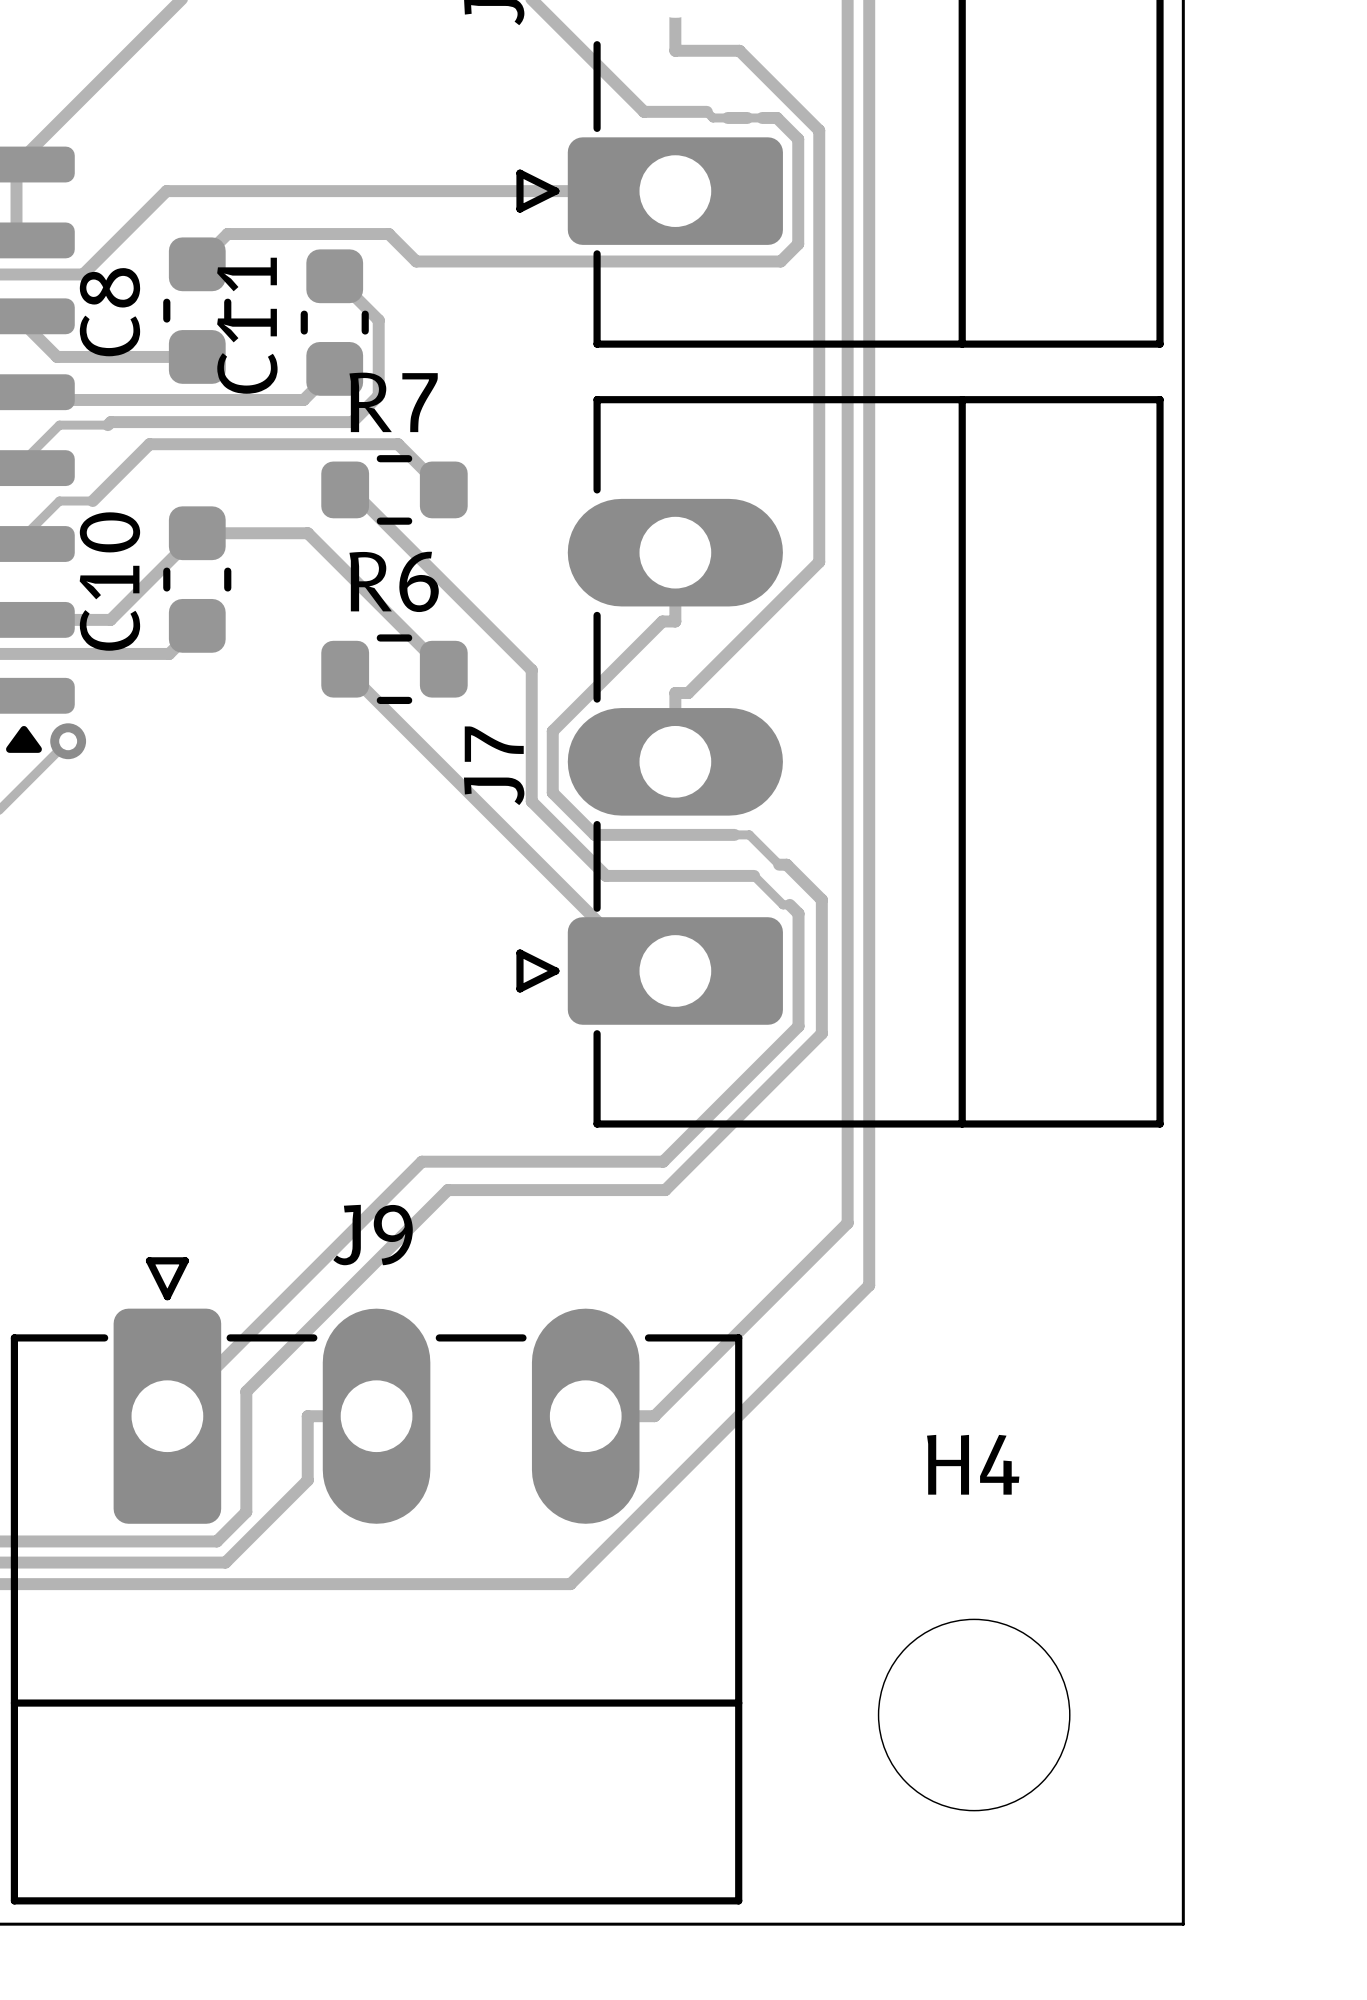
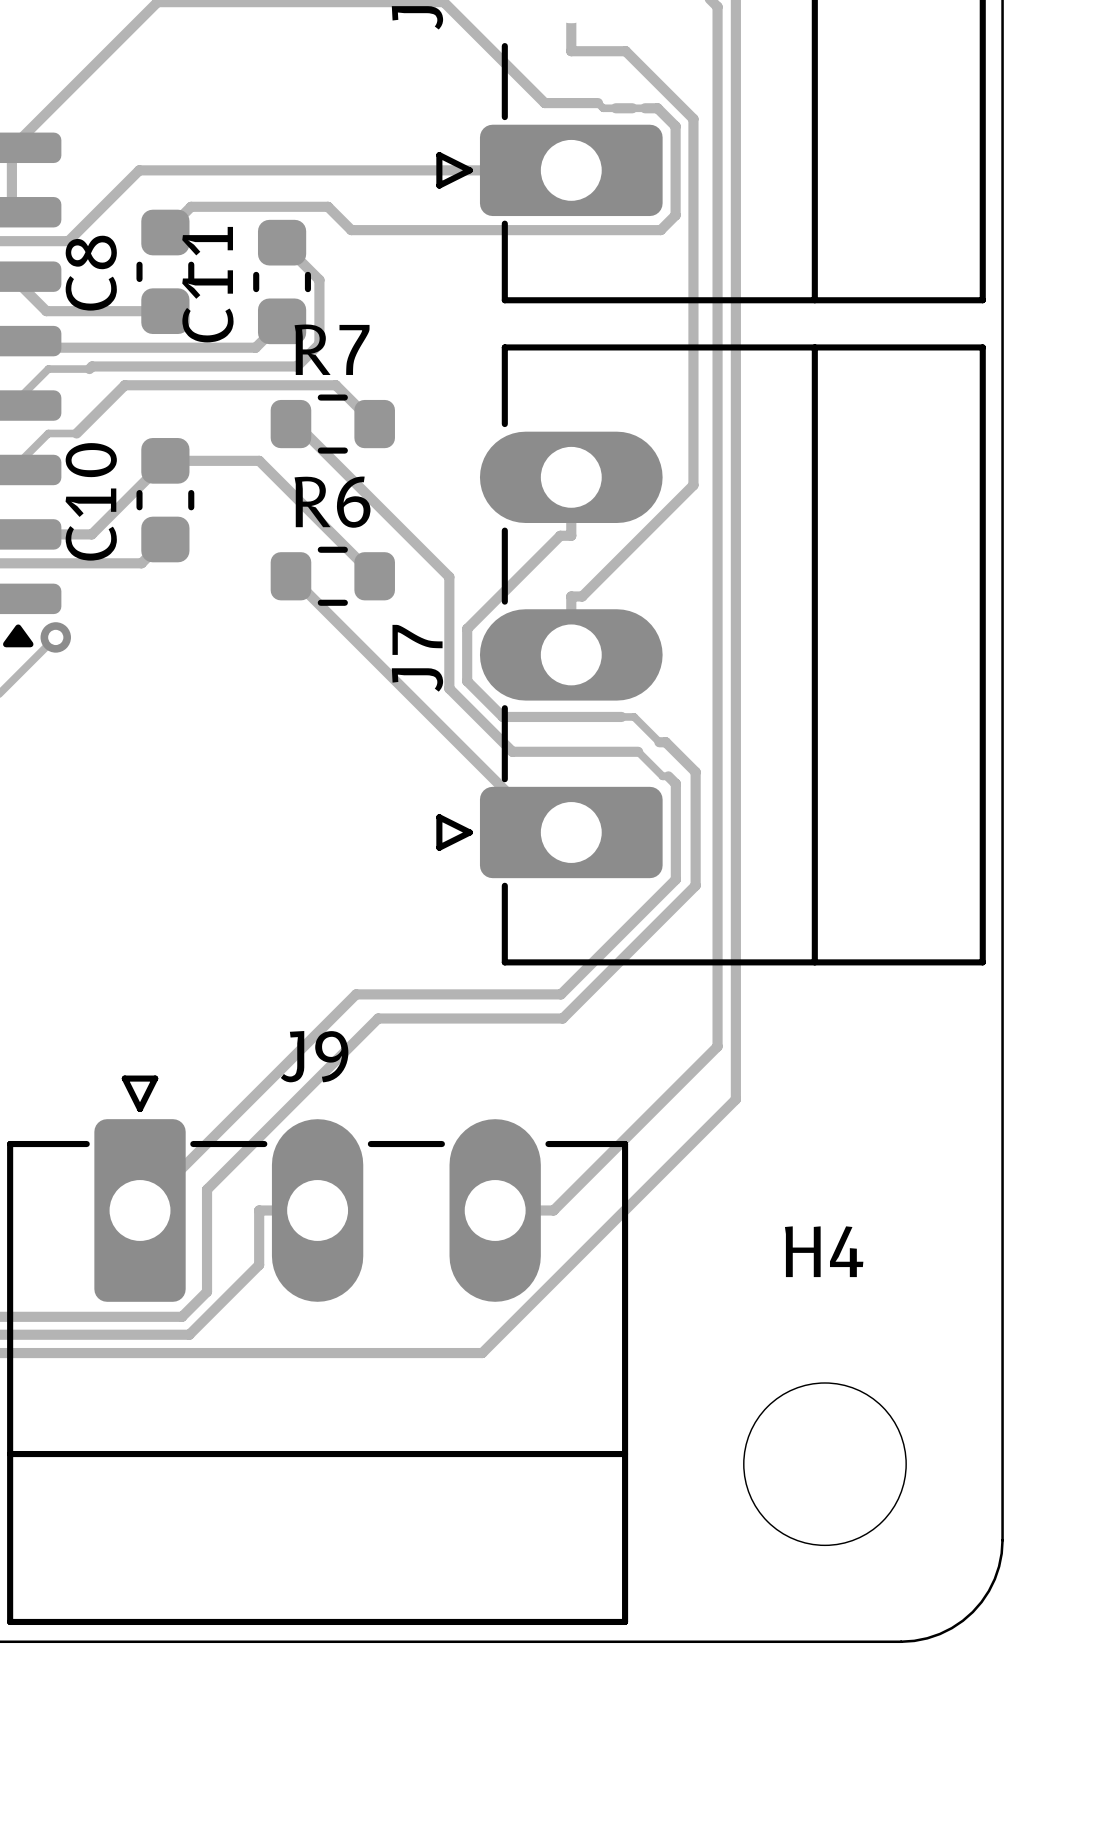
board edge: (1183, 1804) (1183, 1924) (1063, 1924) -> (1002, 1540) (999, 1566) (994, 1579) (981, 1602) (972, 1612) (962, 1620) (939, 1634) (927, 1638) (901, 1641)

